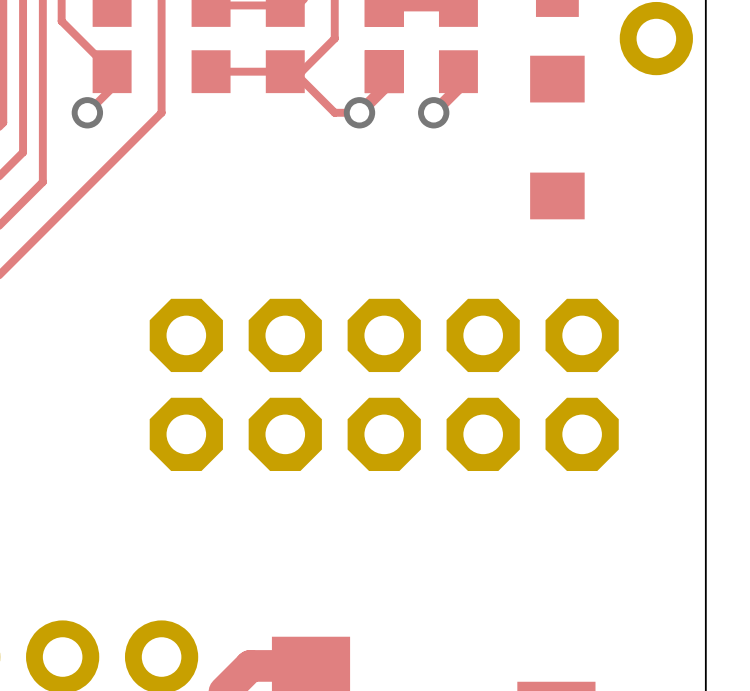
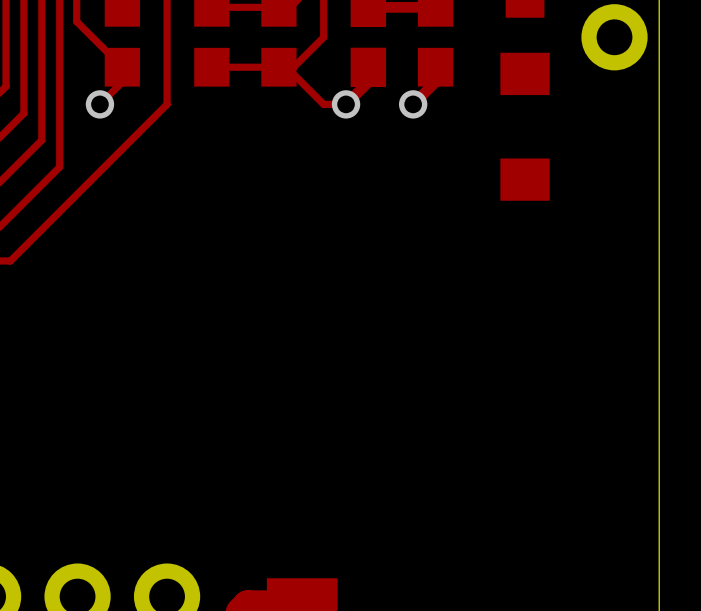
part: (384, 384) -> none

